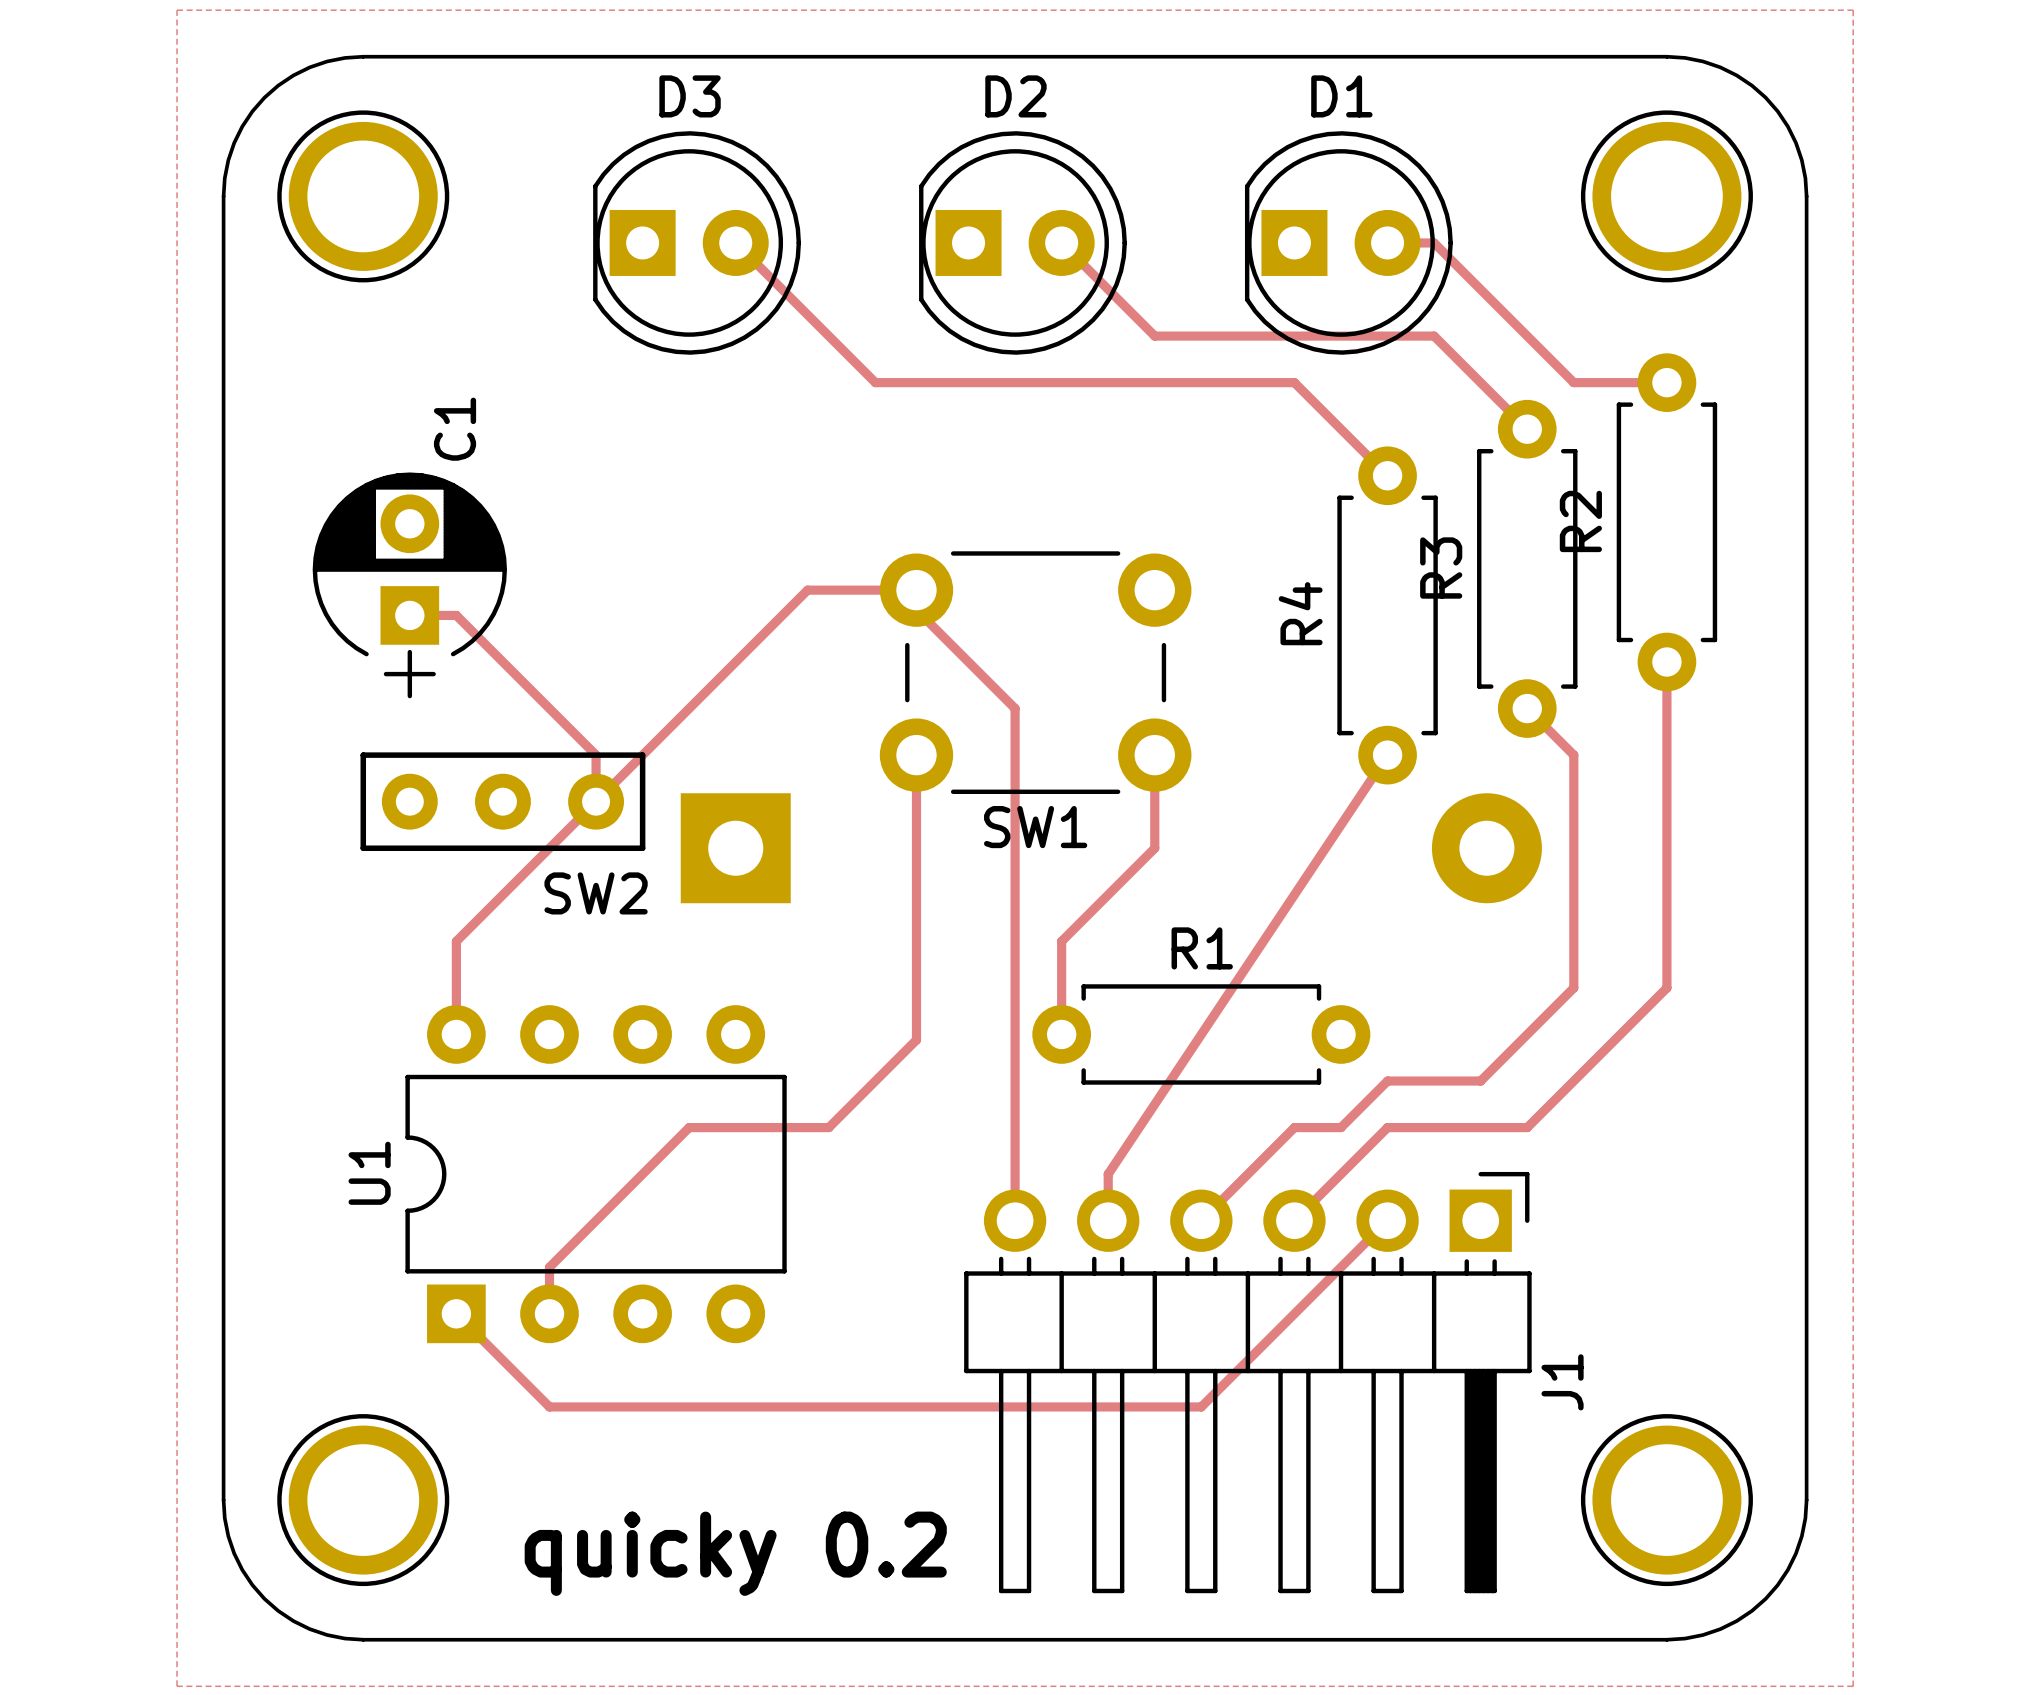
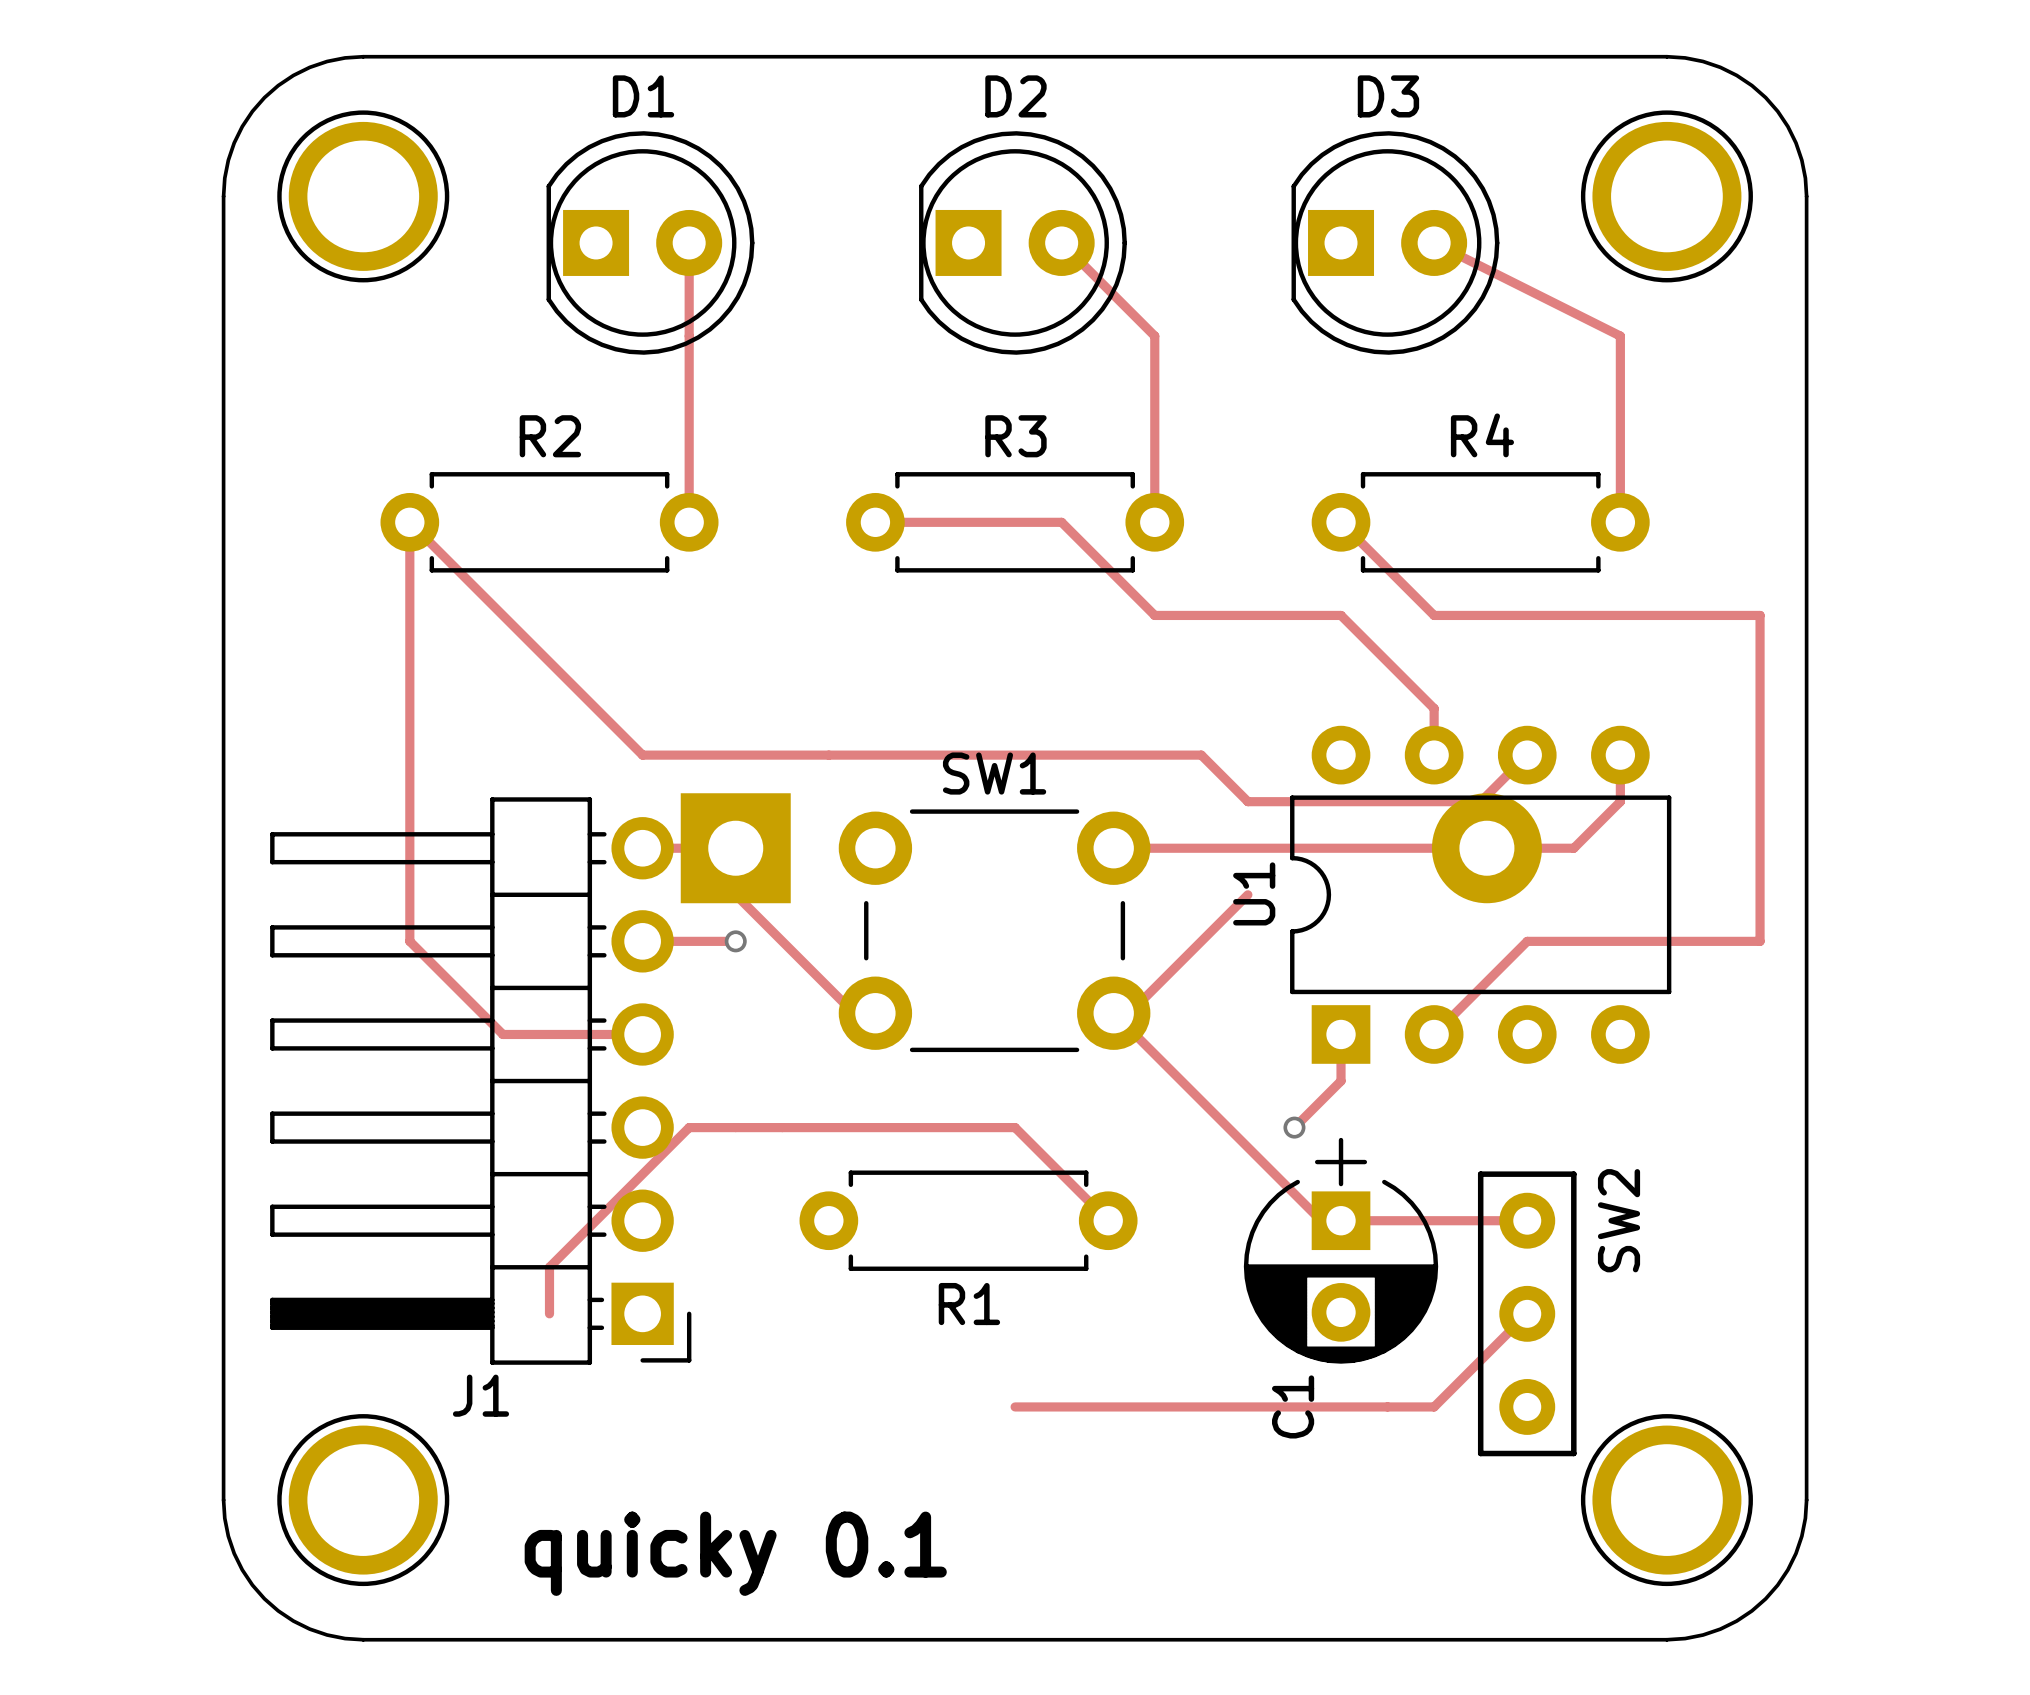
zone outline: (177, 10) (177, 1686) (1853, 1686) (1853, 10) (177, 10) -> none
track: none -> (689, 242) (689, 522)
D3 position: (697, 242) -> (1395, 242)
track: (735, 242) (875, 382) (1294, 382) (1387, 475) -> none
D1 position: (1348, 242) -> (650, 242)
track: (1387, 242) (1434, 242) (1573, 382) (1666, 382) -> none
track: none -> (1434, 242) (1620, 336) (1620, 522)
track: (1154, 336) (1434, 336) (1527, 429) -> (1154, 336) (1154, 522)
track: none -> (875, 522) (1061, 522) (1154, 615) (1341, 615) (1434, 708) (1434, 755)
track: none -> (1341, 522) (1434, 615) (1760, 615) (1760, 941) (1527, 941) (1434, 1034)
R2 rotation: 0° (1666, 522) -> 90° clockwise (549, 522)
R2 position: (1666, 522) -> (549, 522)
R3 rotation: 0° (1527, 568) -> 90° clockwise (1015, 522)
R3 position: (1527, 568) -> (1015, 522)
C1 rotation: 0° (409, 585) -> 180° (1341, 1250)
C1 position: (409, 585) -> (1341, 1250)
track: (409, 615) (456, 615) (596, 755) (596, 801) -> none
R4 rotation: 0° (1387, 615) -> 90° clockwise (1480, 522)
track: (1666, 662) (1666, 987) (1527, 1127) (1387, 1127) (1294, 1220) -> none
SW1 position: (1035, 672) -> (994, 930)
track: (1527, 708) (1573, 755) (1573, 987) (1480, 1081) (1387, 1081) (1341, 1127) (1294, 1127) (1201, 1220) -> none
track: (916, 755) (916, 1039) (828, 1127) -> (1108, 1220) (1015, 1127) (828, 1127)
track: (1154, 755) (1154, 848) (1061, 941) (1061, 1034) -> none
track: (1387, 755) (1108, 1174) (1108, 1220) -> none
track: none -> (1527, 755) (1480, 801) (1247, 801) (1201, 755) (642, 755) (409, 522) (409, 941) (502, 1034) (642, 1034)
track: none -> (1620, 755) (1620, 801) (1573, 848) (1113, 848)
SW2 rotation: 0° (502, 801) -> 90° clockwise (1527, 1313)
SW2 position: (502, 801) -> (1527, 1313)
SW1 name position: SW1 (1035, 827) -> SW1 (994, 773)
track: none -> (642, 848) (689, 848) (854, 1013) (875, 1013)
SW2 name position: SW2 (596, 893) -> SW2 (1619, 1220)
track: none -> (1247, 894) (1129, 1013) (1113, 1013) (1321, 1220) (1527, 1220)
track: none -> (642, 941) (735, 941)
via: none -> (735, 941)
R1 name position: R1 (1202, 948) -> R1 (969, 1304)
track: (456, 1034) (456, 941) (807, 590) (916, 590) (916, 609) (1015, 708) (1015, 1220) -> none
R1 position: (1201, 1034) -> (968, 1220)
track: none -> (1341, 1034) (1341, 1081) (1294, 1127)
via: none -> (1294, 1127)
U1 position: (596, 1174) -> (1480, 894)
track: (1387, 1220) (1201, 1406) -> (1527, 1313) (1434, 1406) (1201, 1406)
track: (456, 1313) (549, 1406) (1015, 1406) -> none
J1 rotation: 0° (1247, 1382) -> 90° clockwise (480, 1081)
J1 position: (1247, 1382) -> (480, 1081)
text: quicky 0.2 (735, 1553) -> quicky 0.1 (735, 1553)

